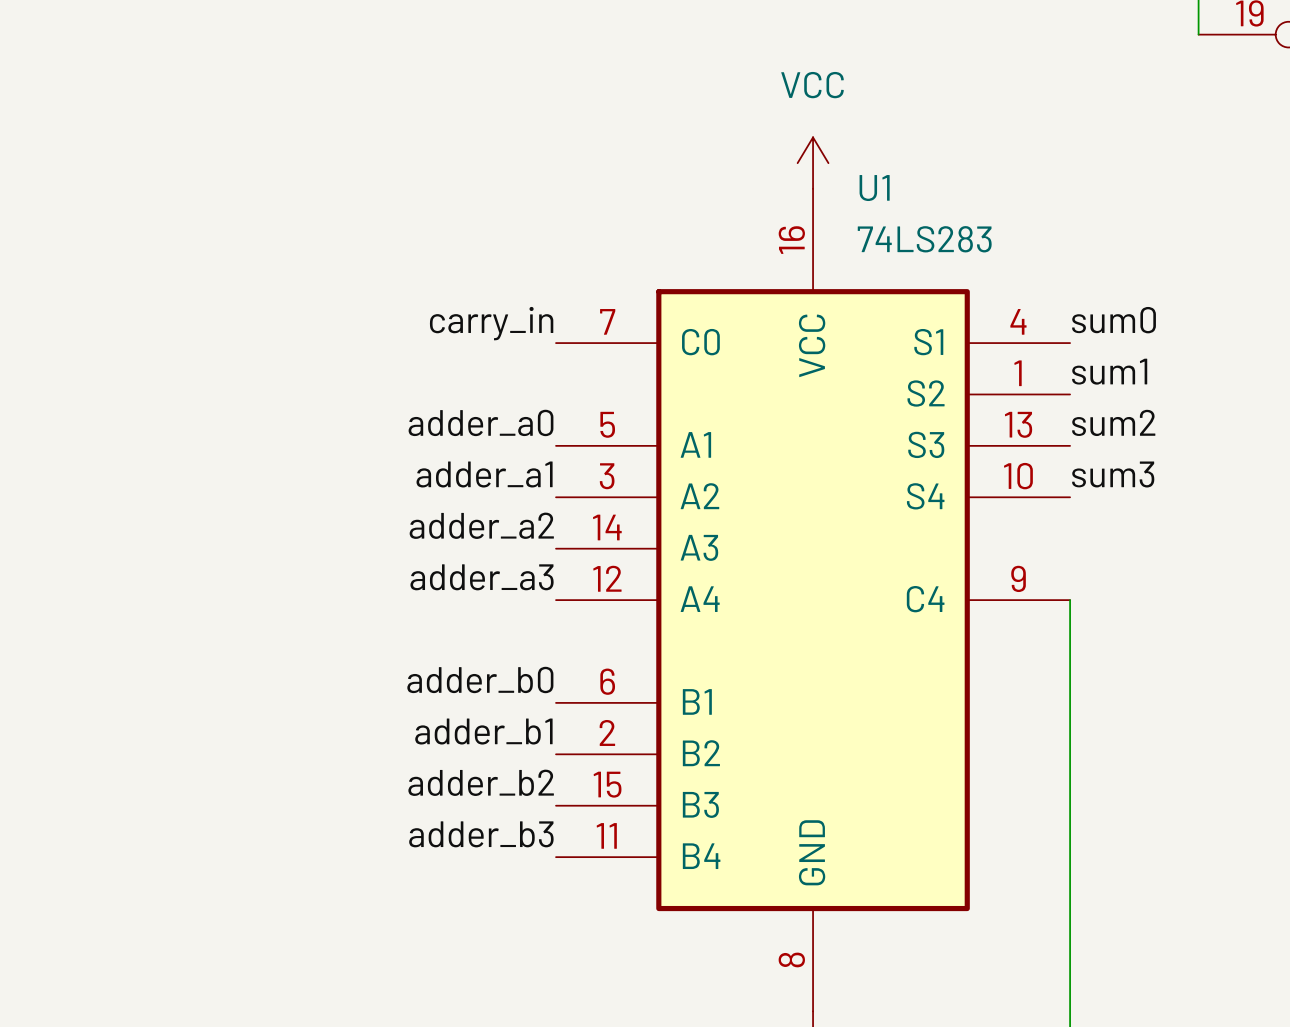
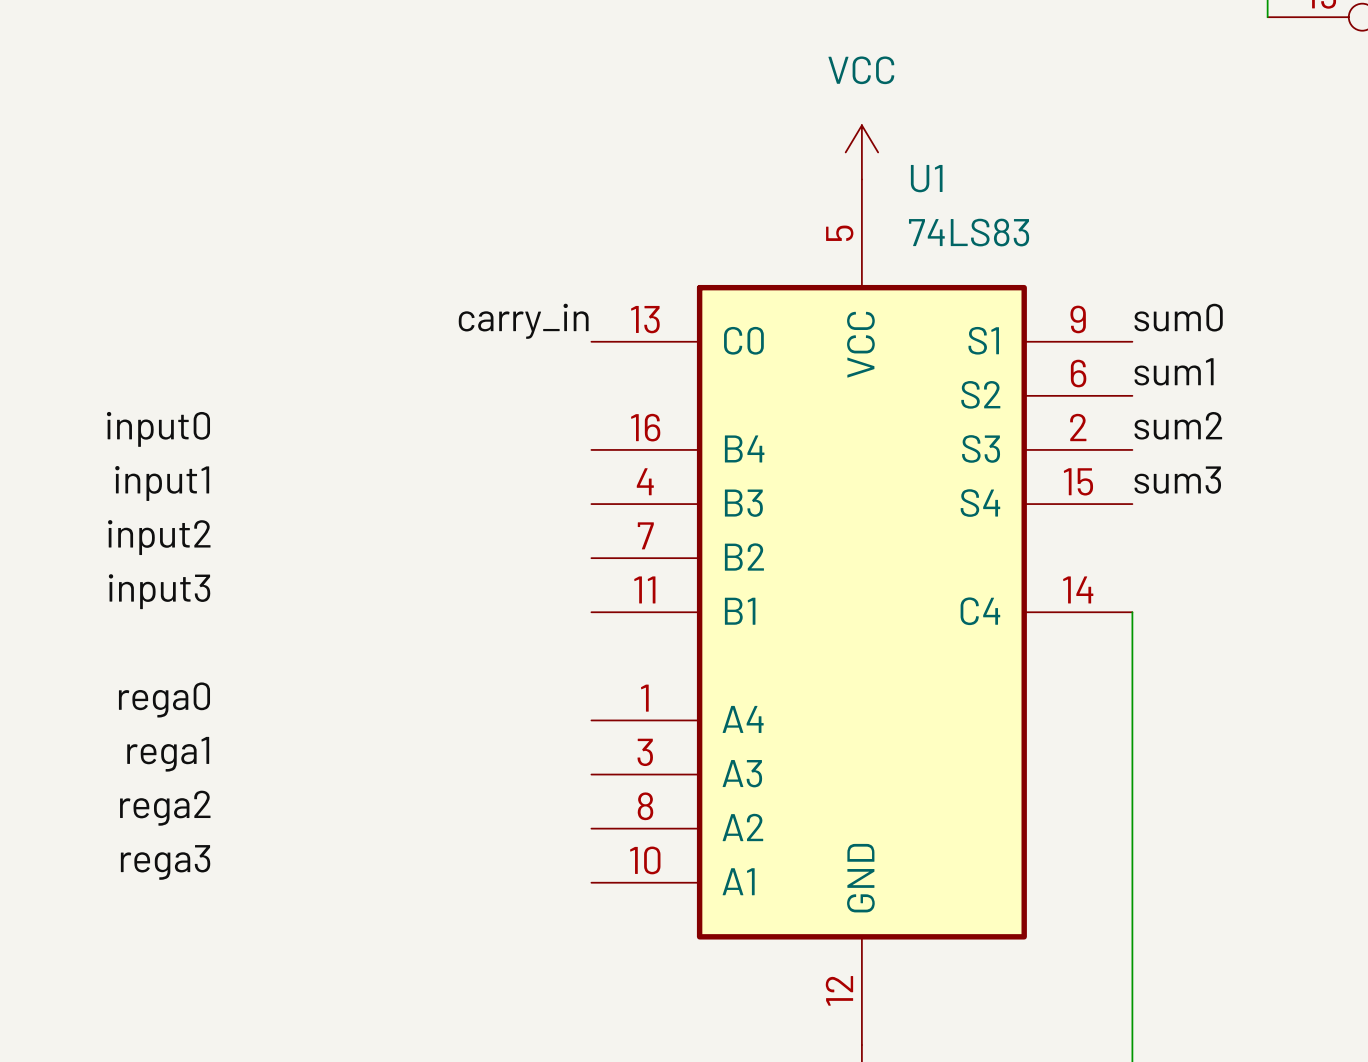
U1 symbol: [556, 188, 1071, 1012] -> [591, 179, 1133, 1046]
U1 value: 74LS283 (924, 239) -> 74LS83 (969, 232)
label: adder_a0 (481, 422) -> none
label: none -> input0 (158, 429)
label: adder_a1 (484, 474) -> none
label: none -> input1 (162, 483)
label: adder_a2 (481, 525) -> none
label: none -> input2 (159, 537)
label: adder_a3 (482, 577) -> none
label: none -> input3 (159, 591)
label: adder_b0 (480, 679) -> none
label: none -> rega0 (164, 699)
label: adder_b1 (483, 731) -> none
label: none -> rega1 (168, 754)
label: adder_b2 (481, 782) -> none
label: none -> rega2 (165, 808)
label: adder_b3 (481, 834) -> none
label: none -> rega3 (165, 862)

